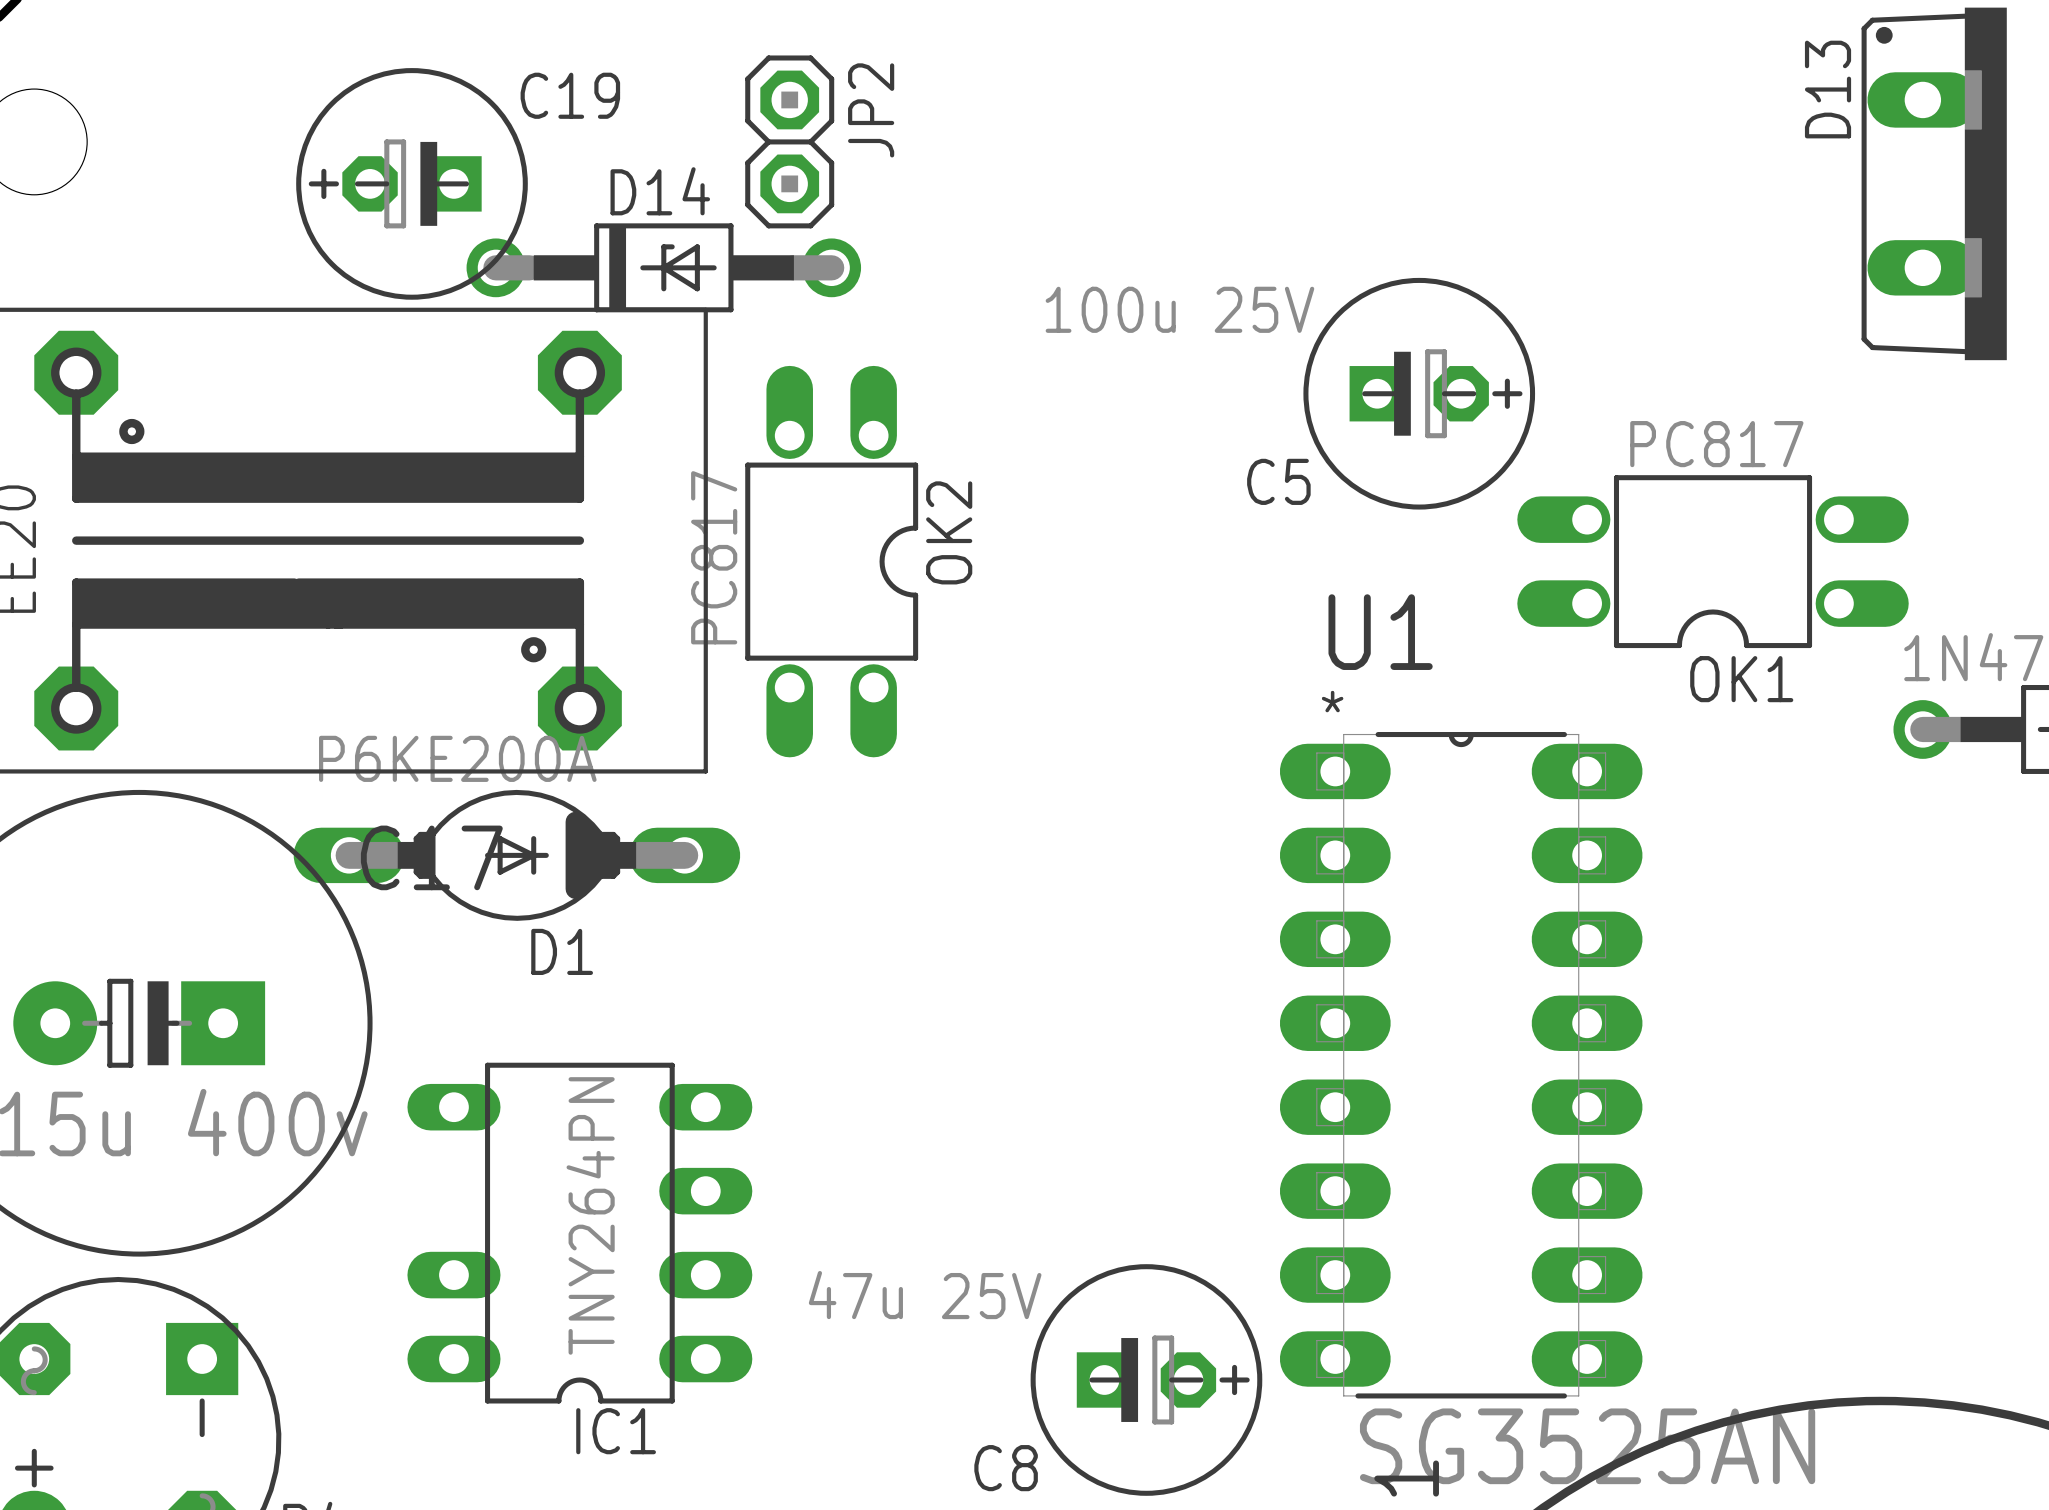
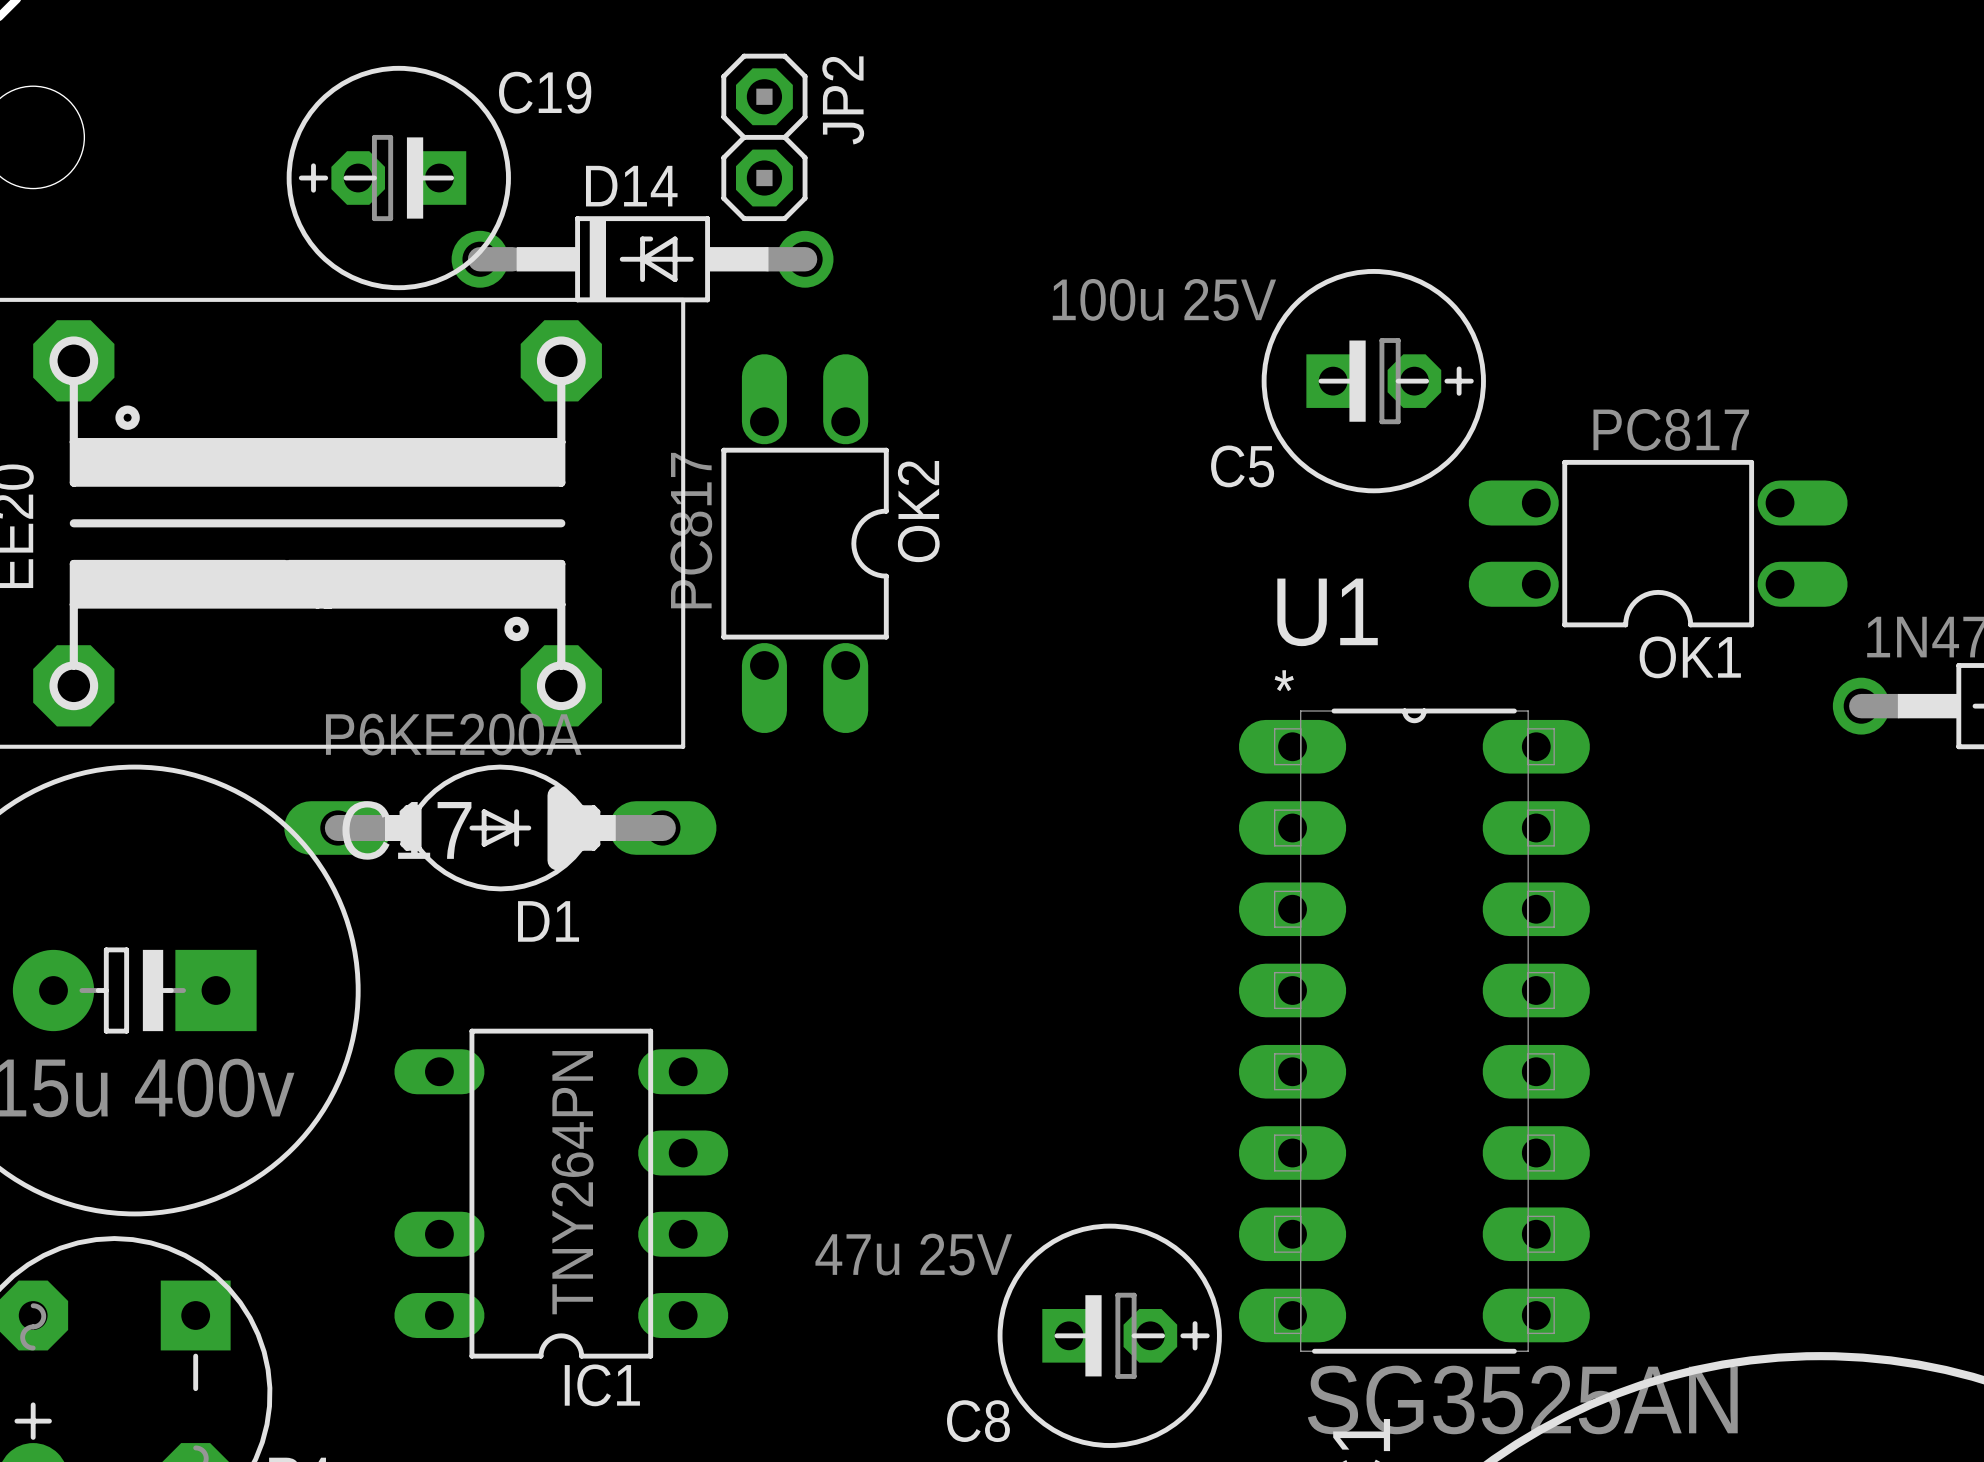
D13: (1934, 183) -> none

